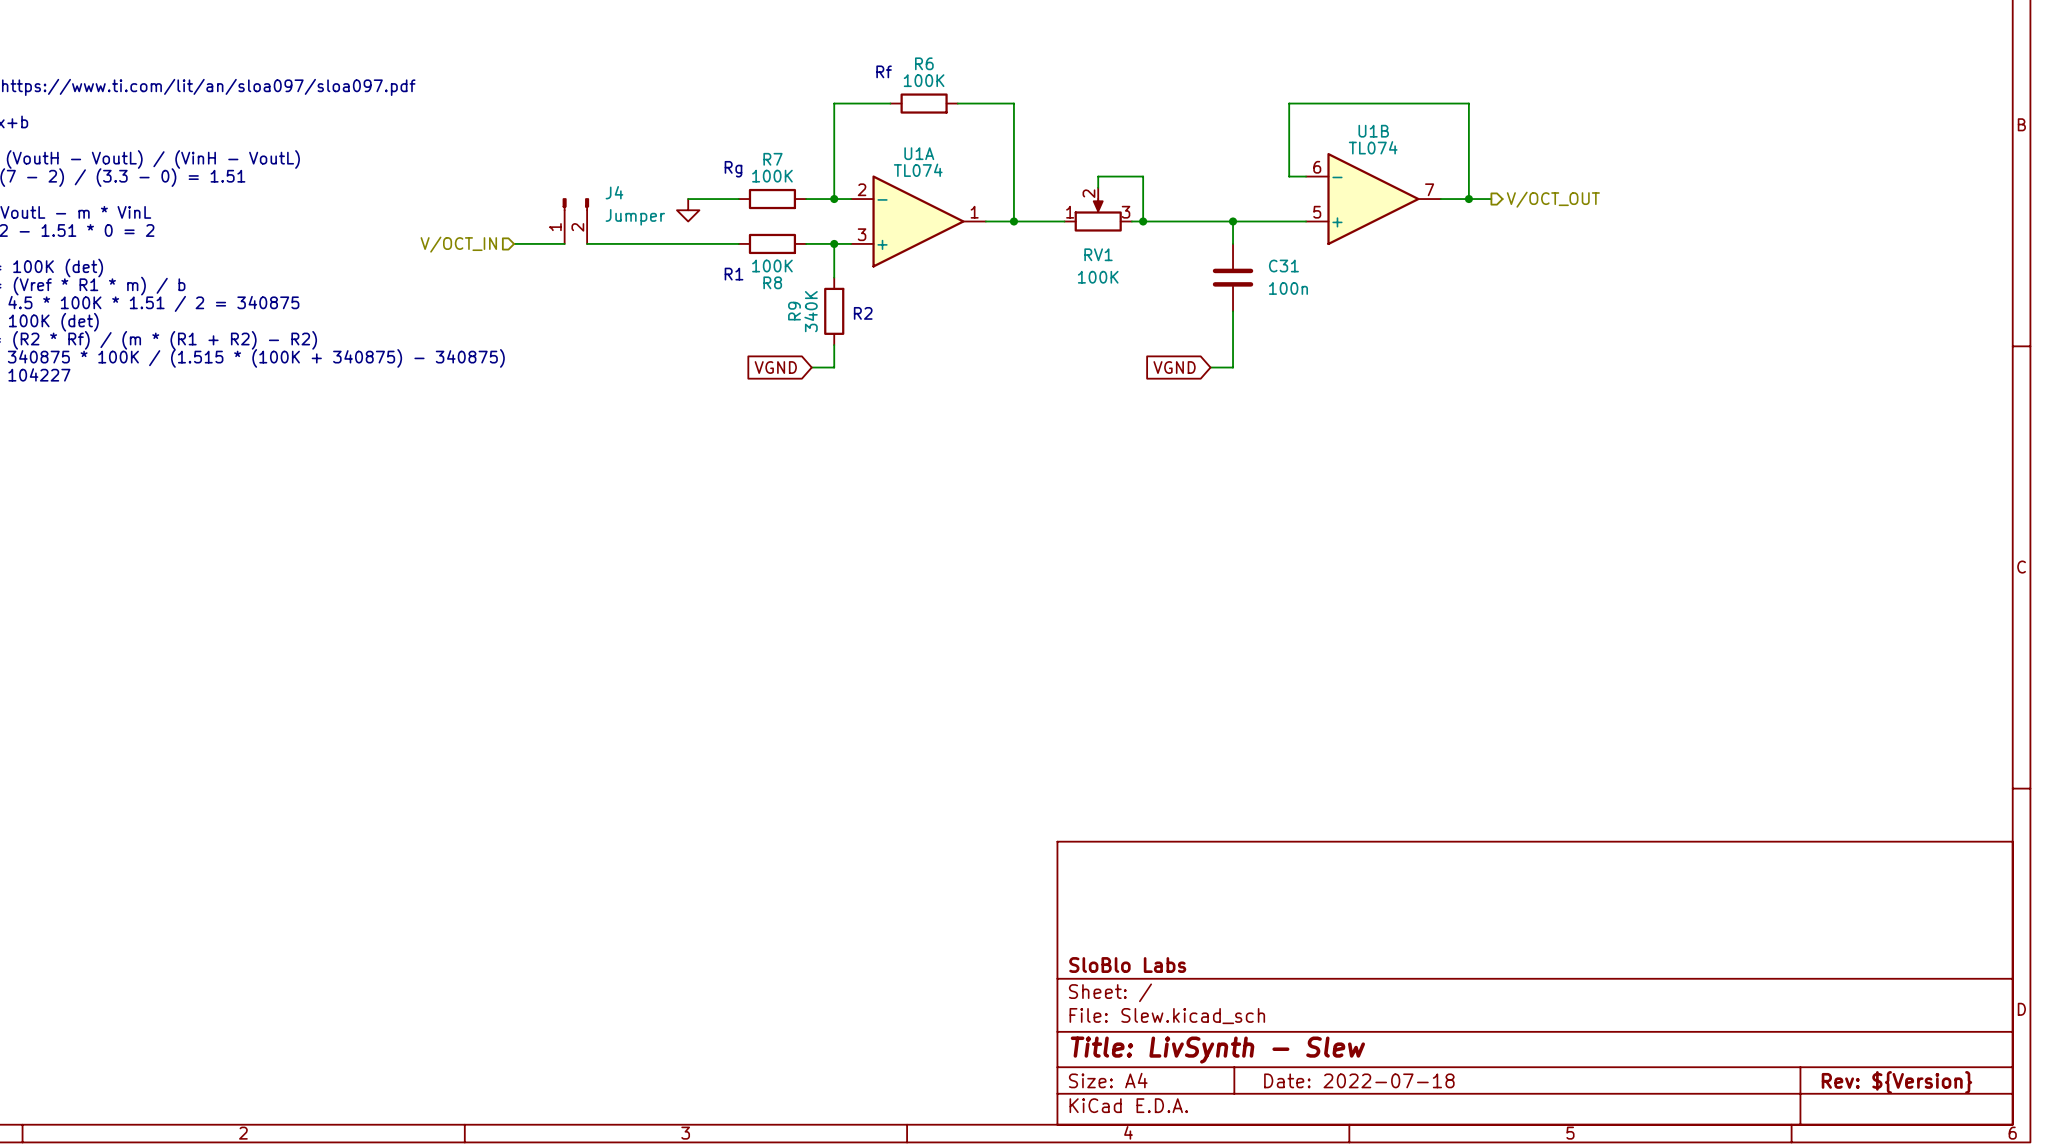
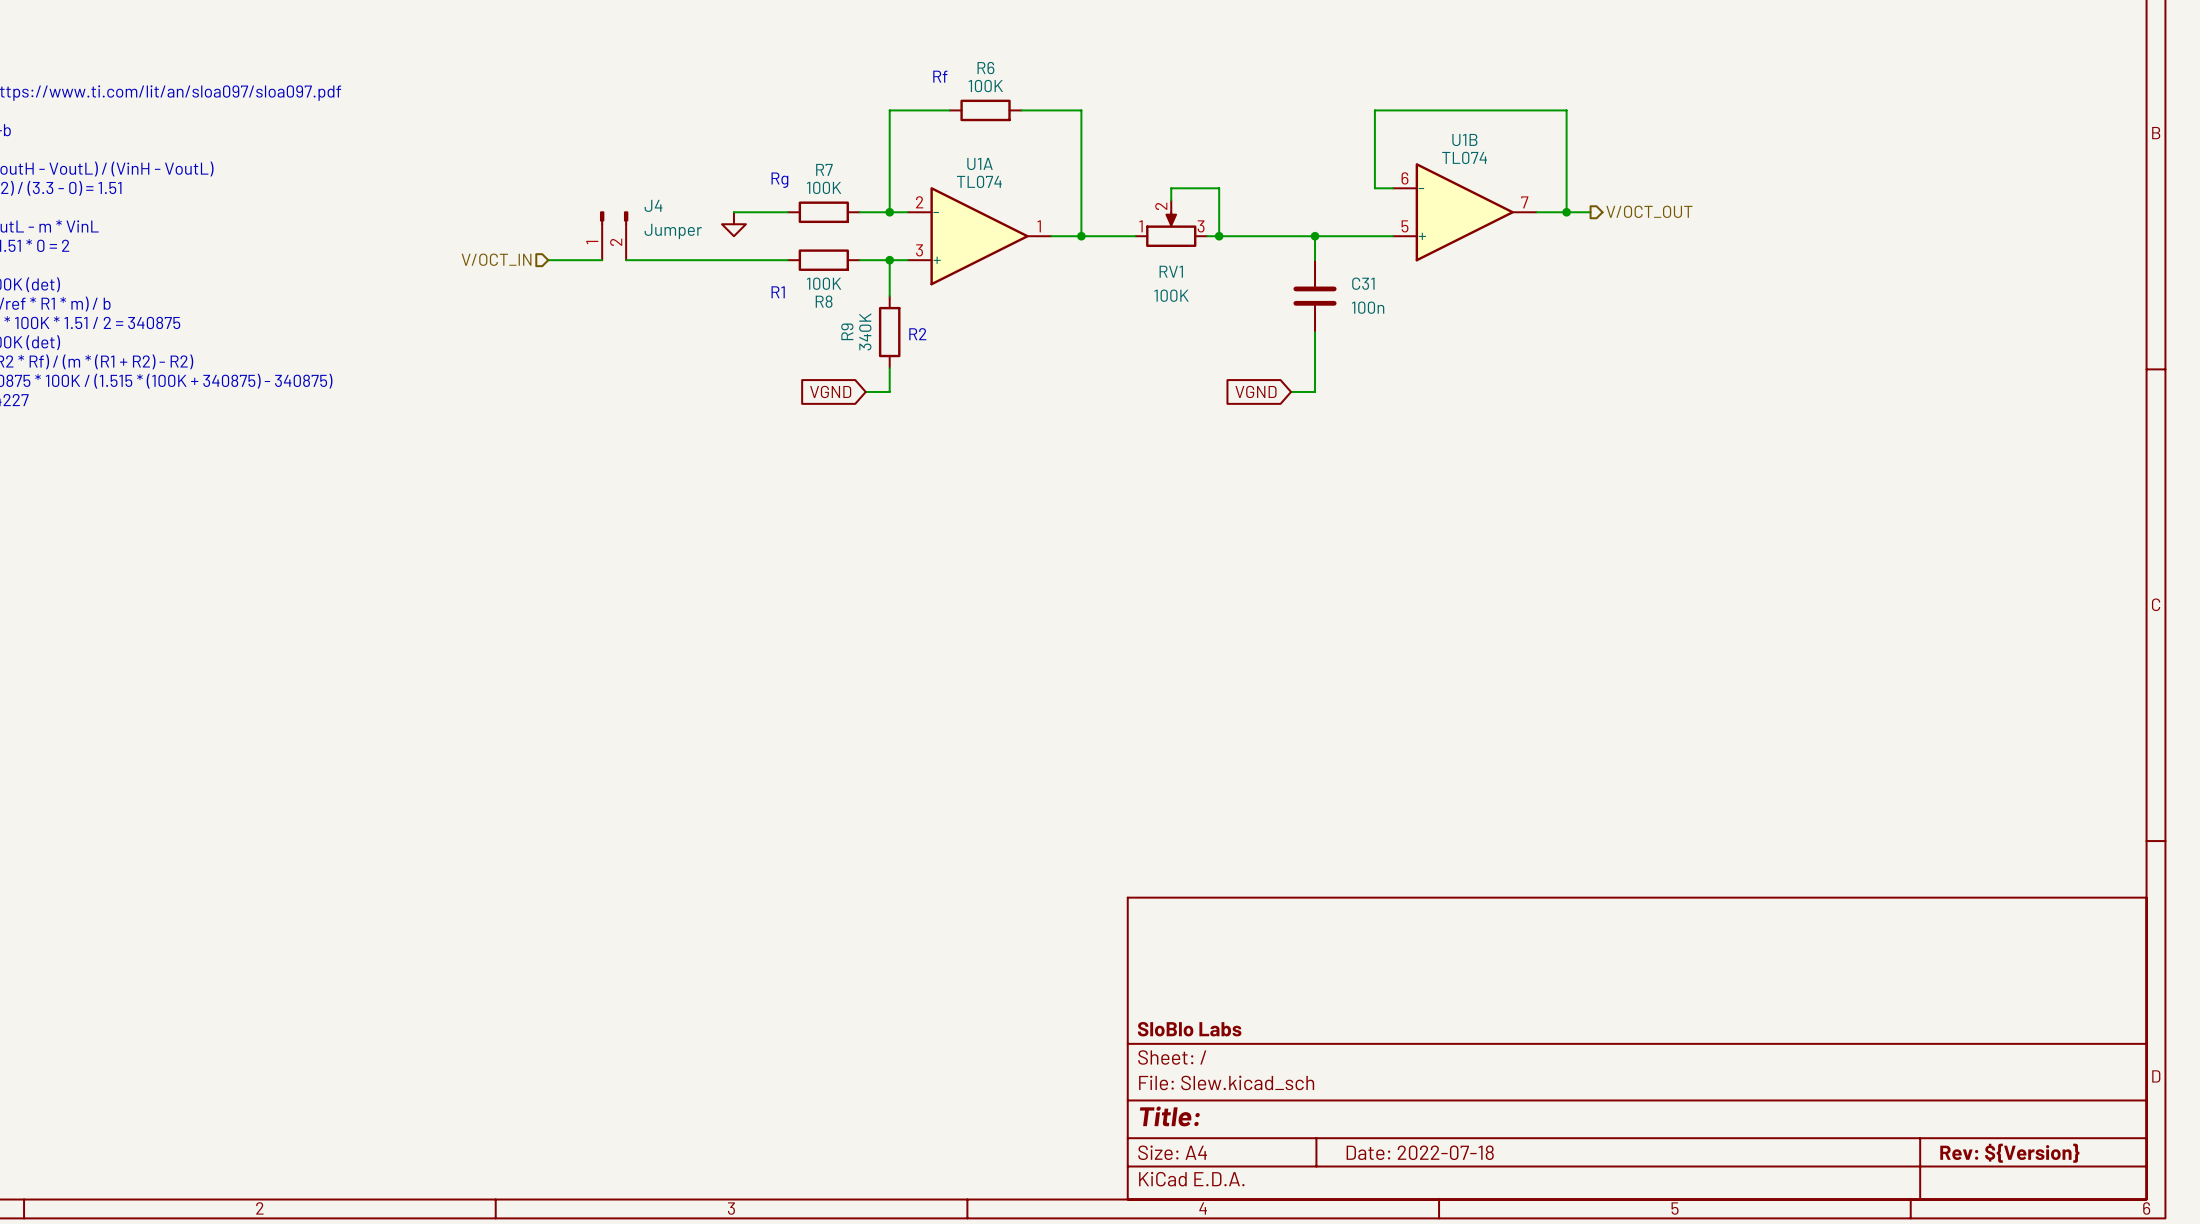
title block: Title: LivSynth - Slew (1217, 1050) -> Title: (1169, 1116)

